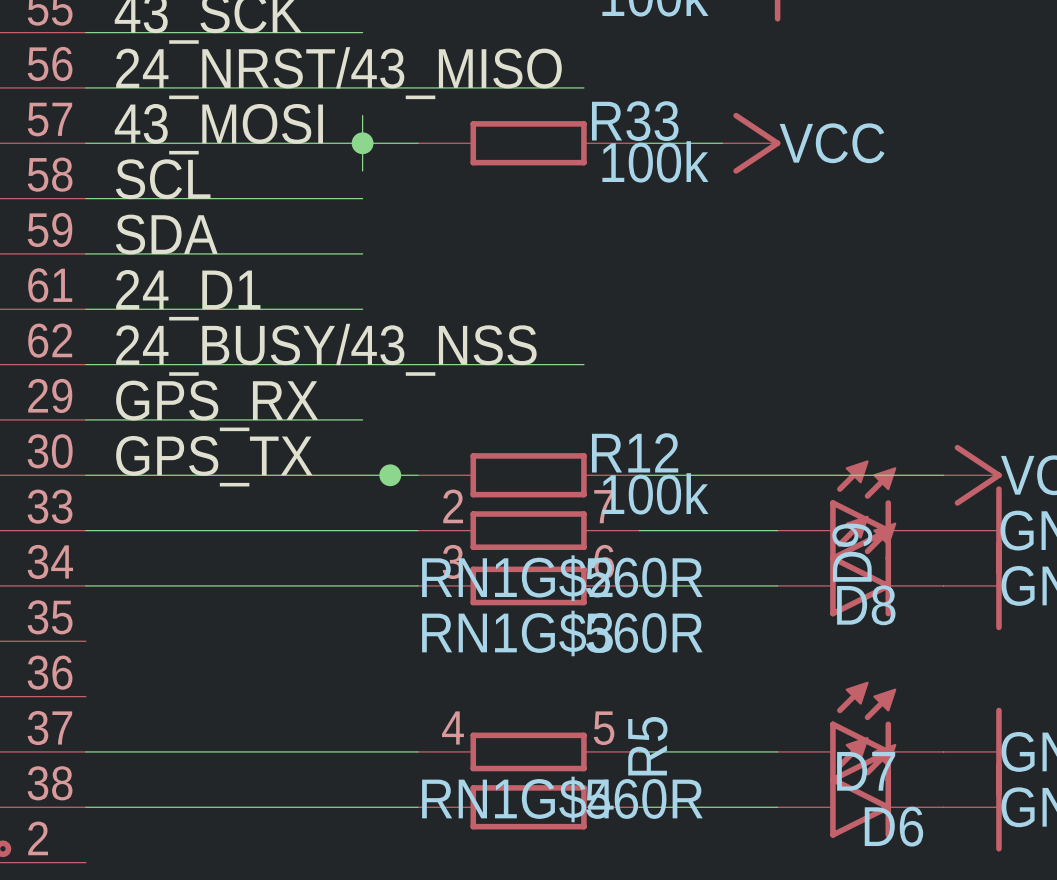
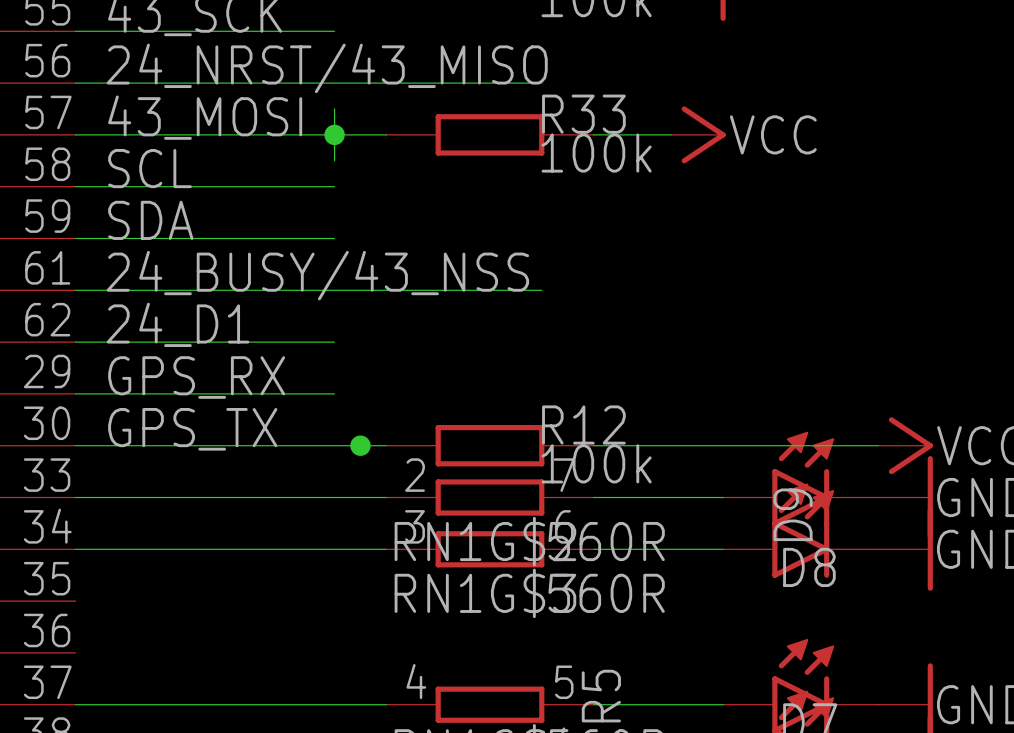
label: 24_D1 (188, 295) -> 24_BUSY/43_NSS (317, 275)
label: 24_BUSY/43_NSS (326, 349) -> 24_D1 (177, 324)
wire: (362, 364) (583, 364) -> (334, 290) (541, 290)

